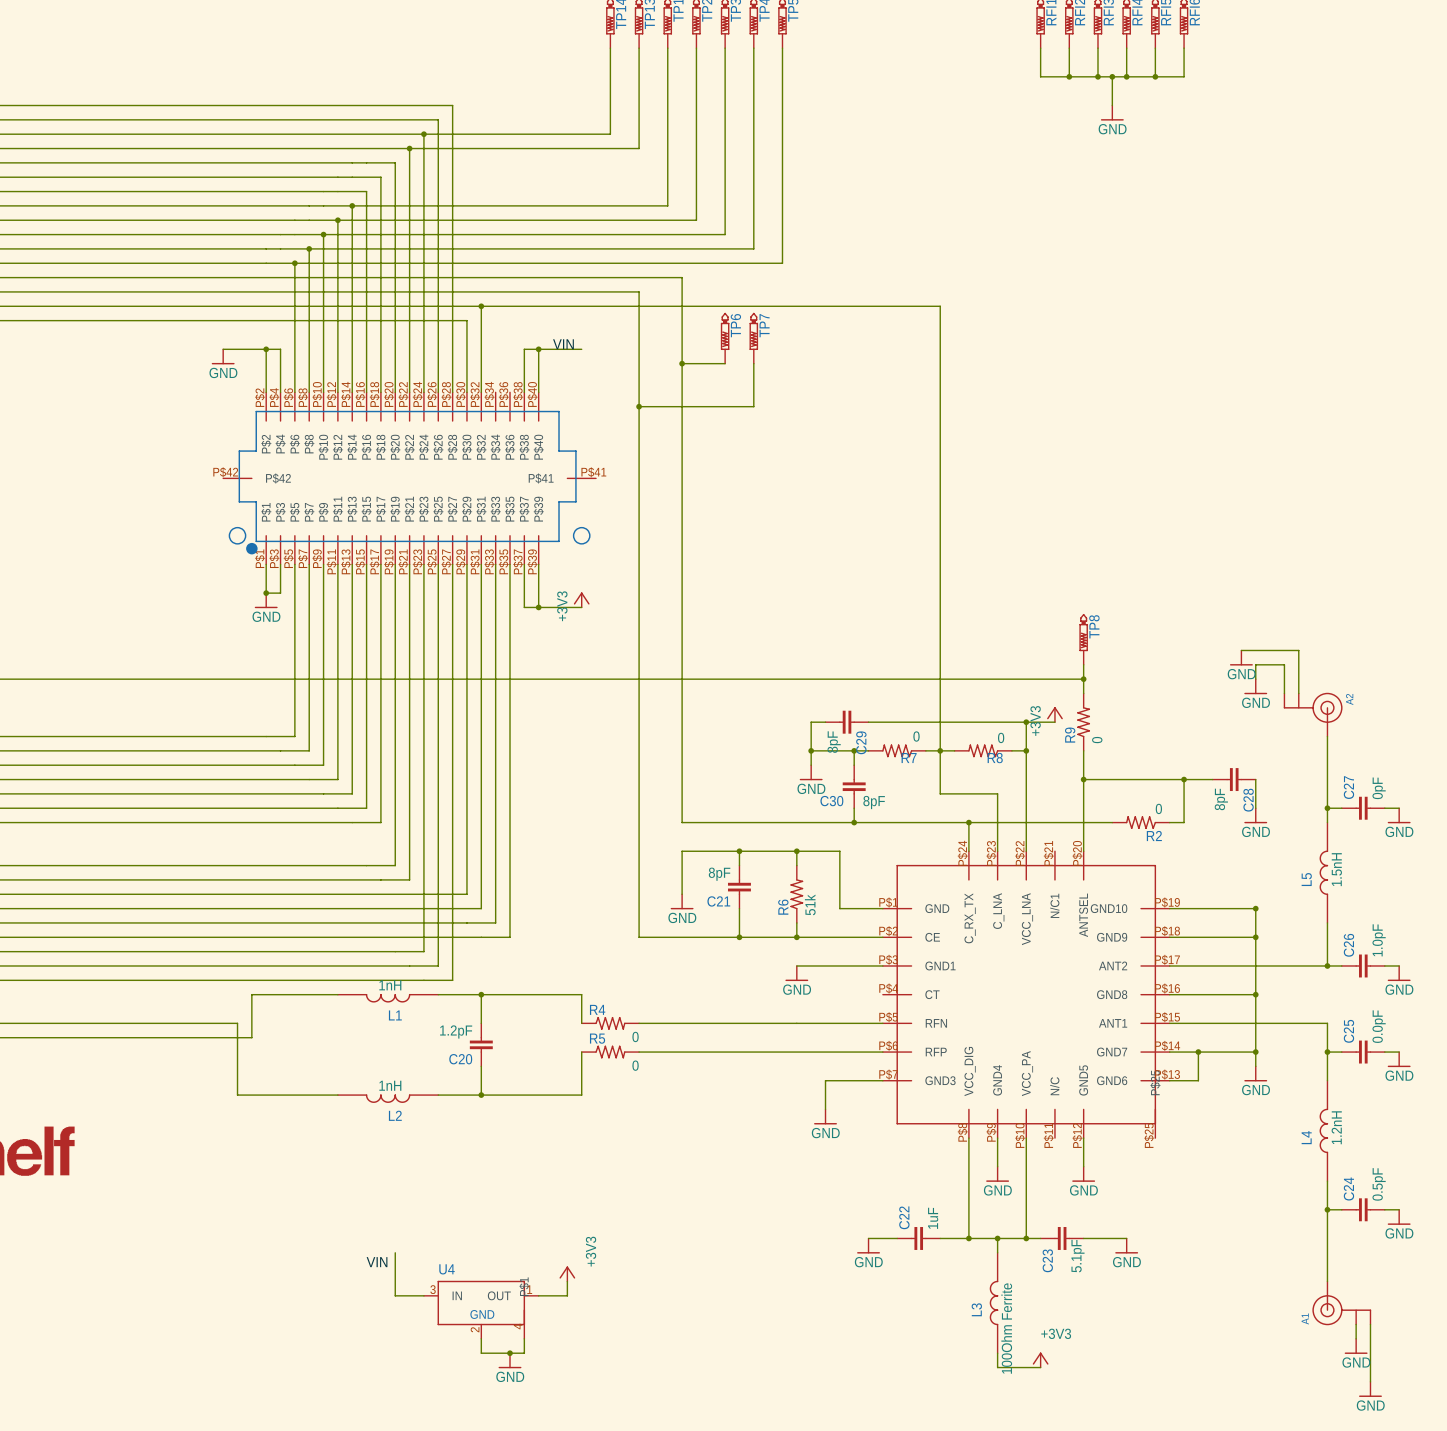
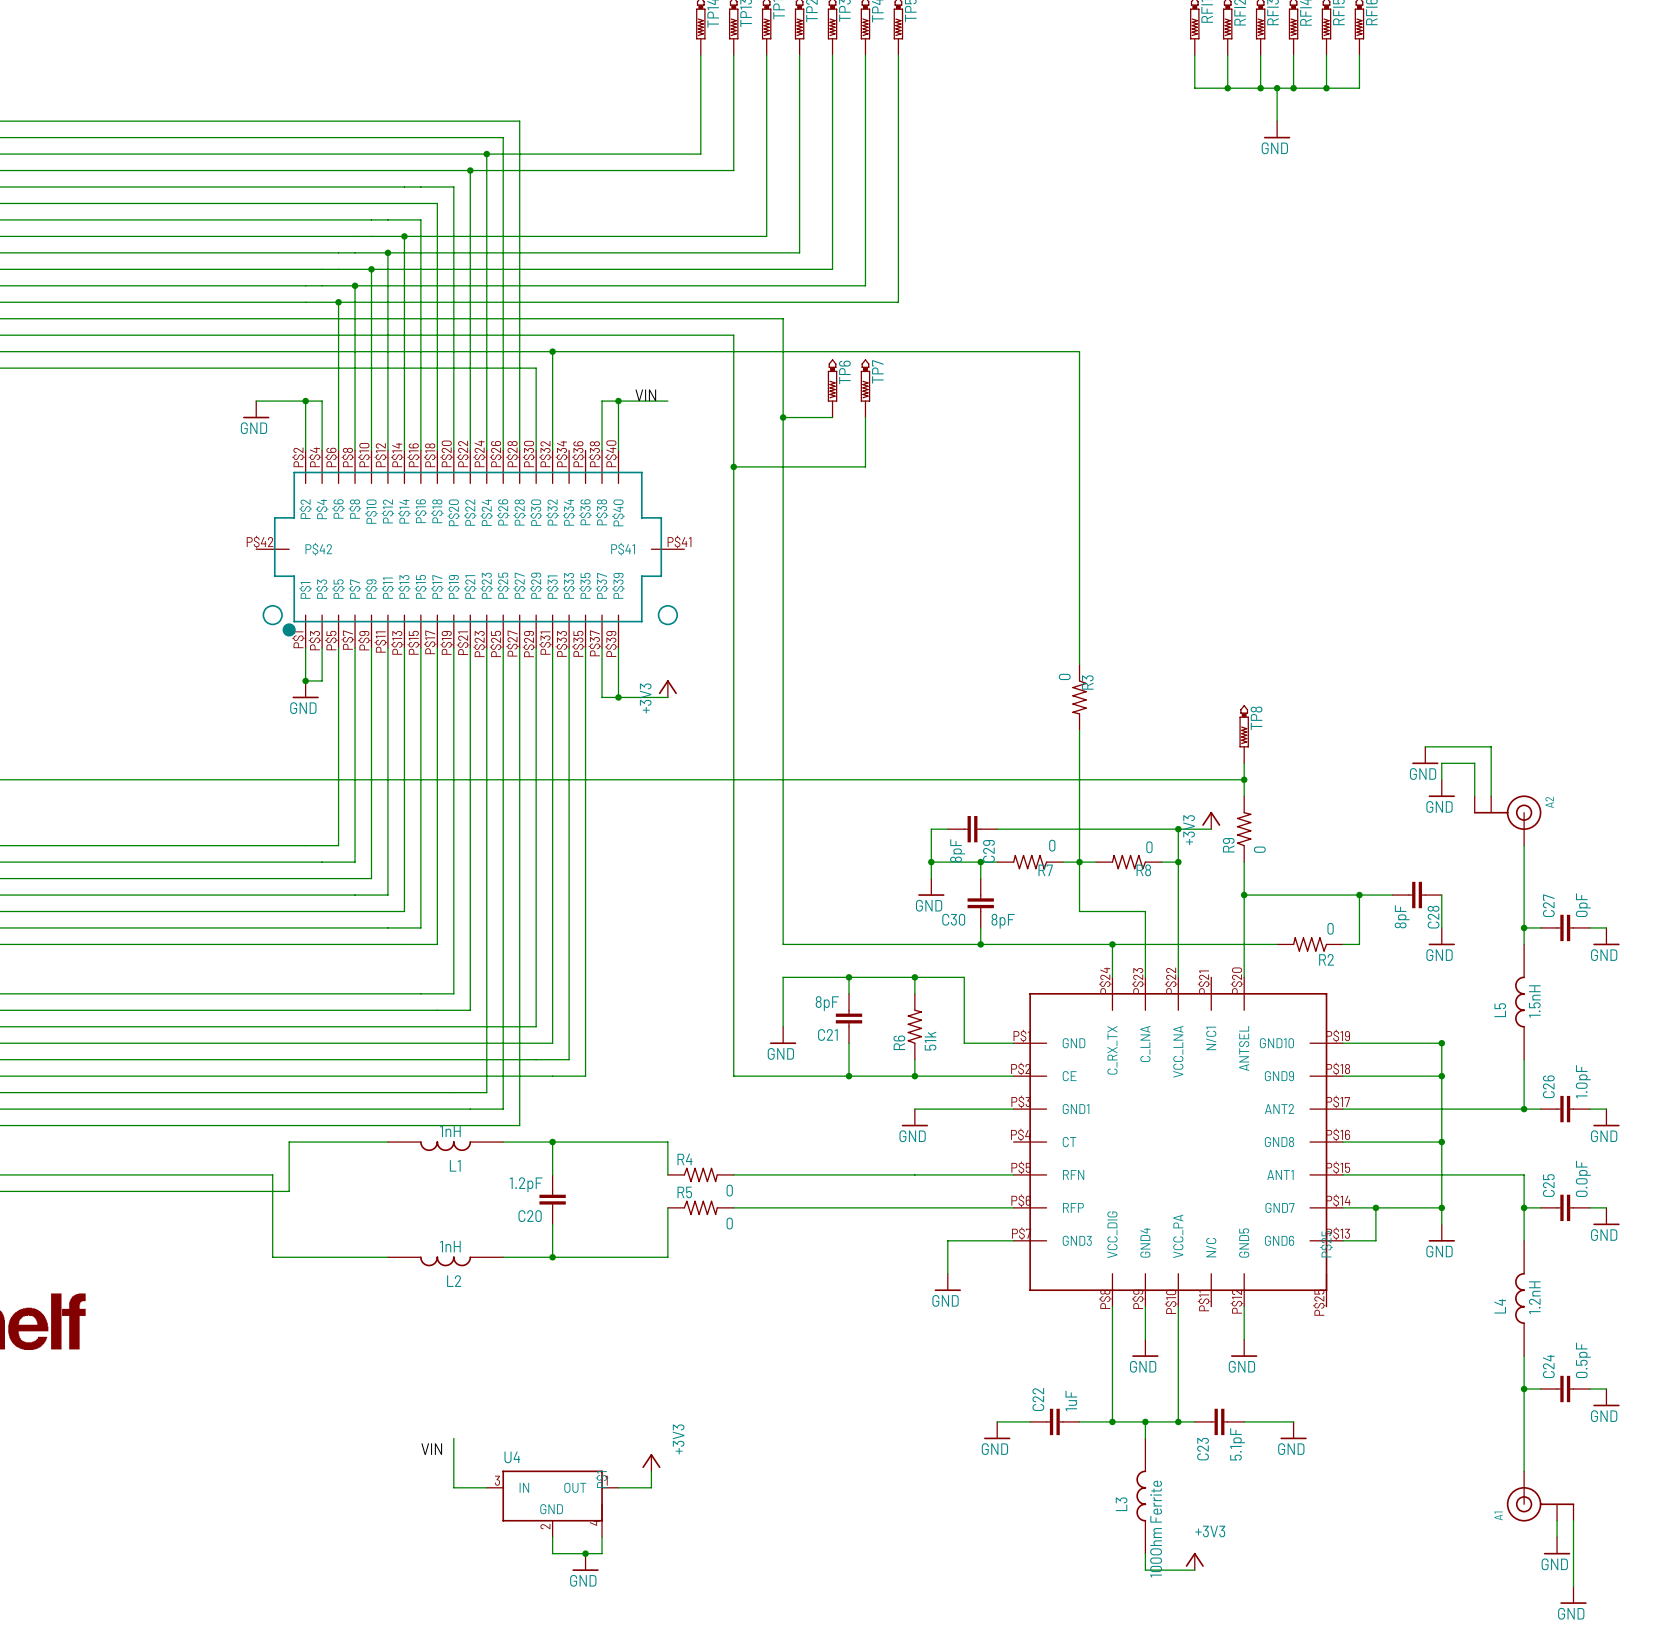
R3: none -> 0 (1079, 697)

